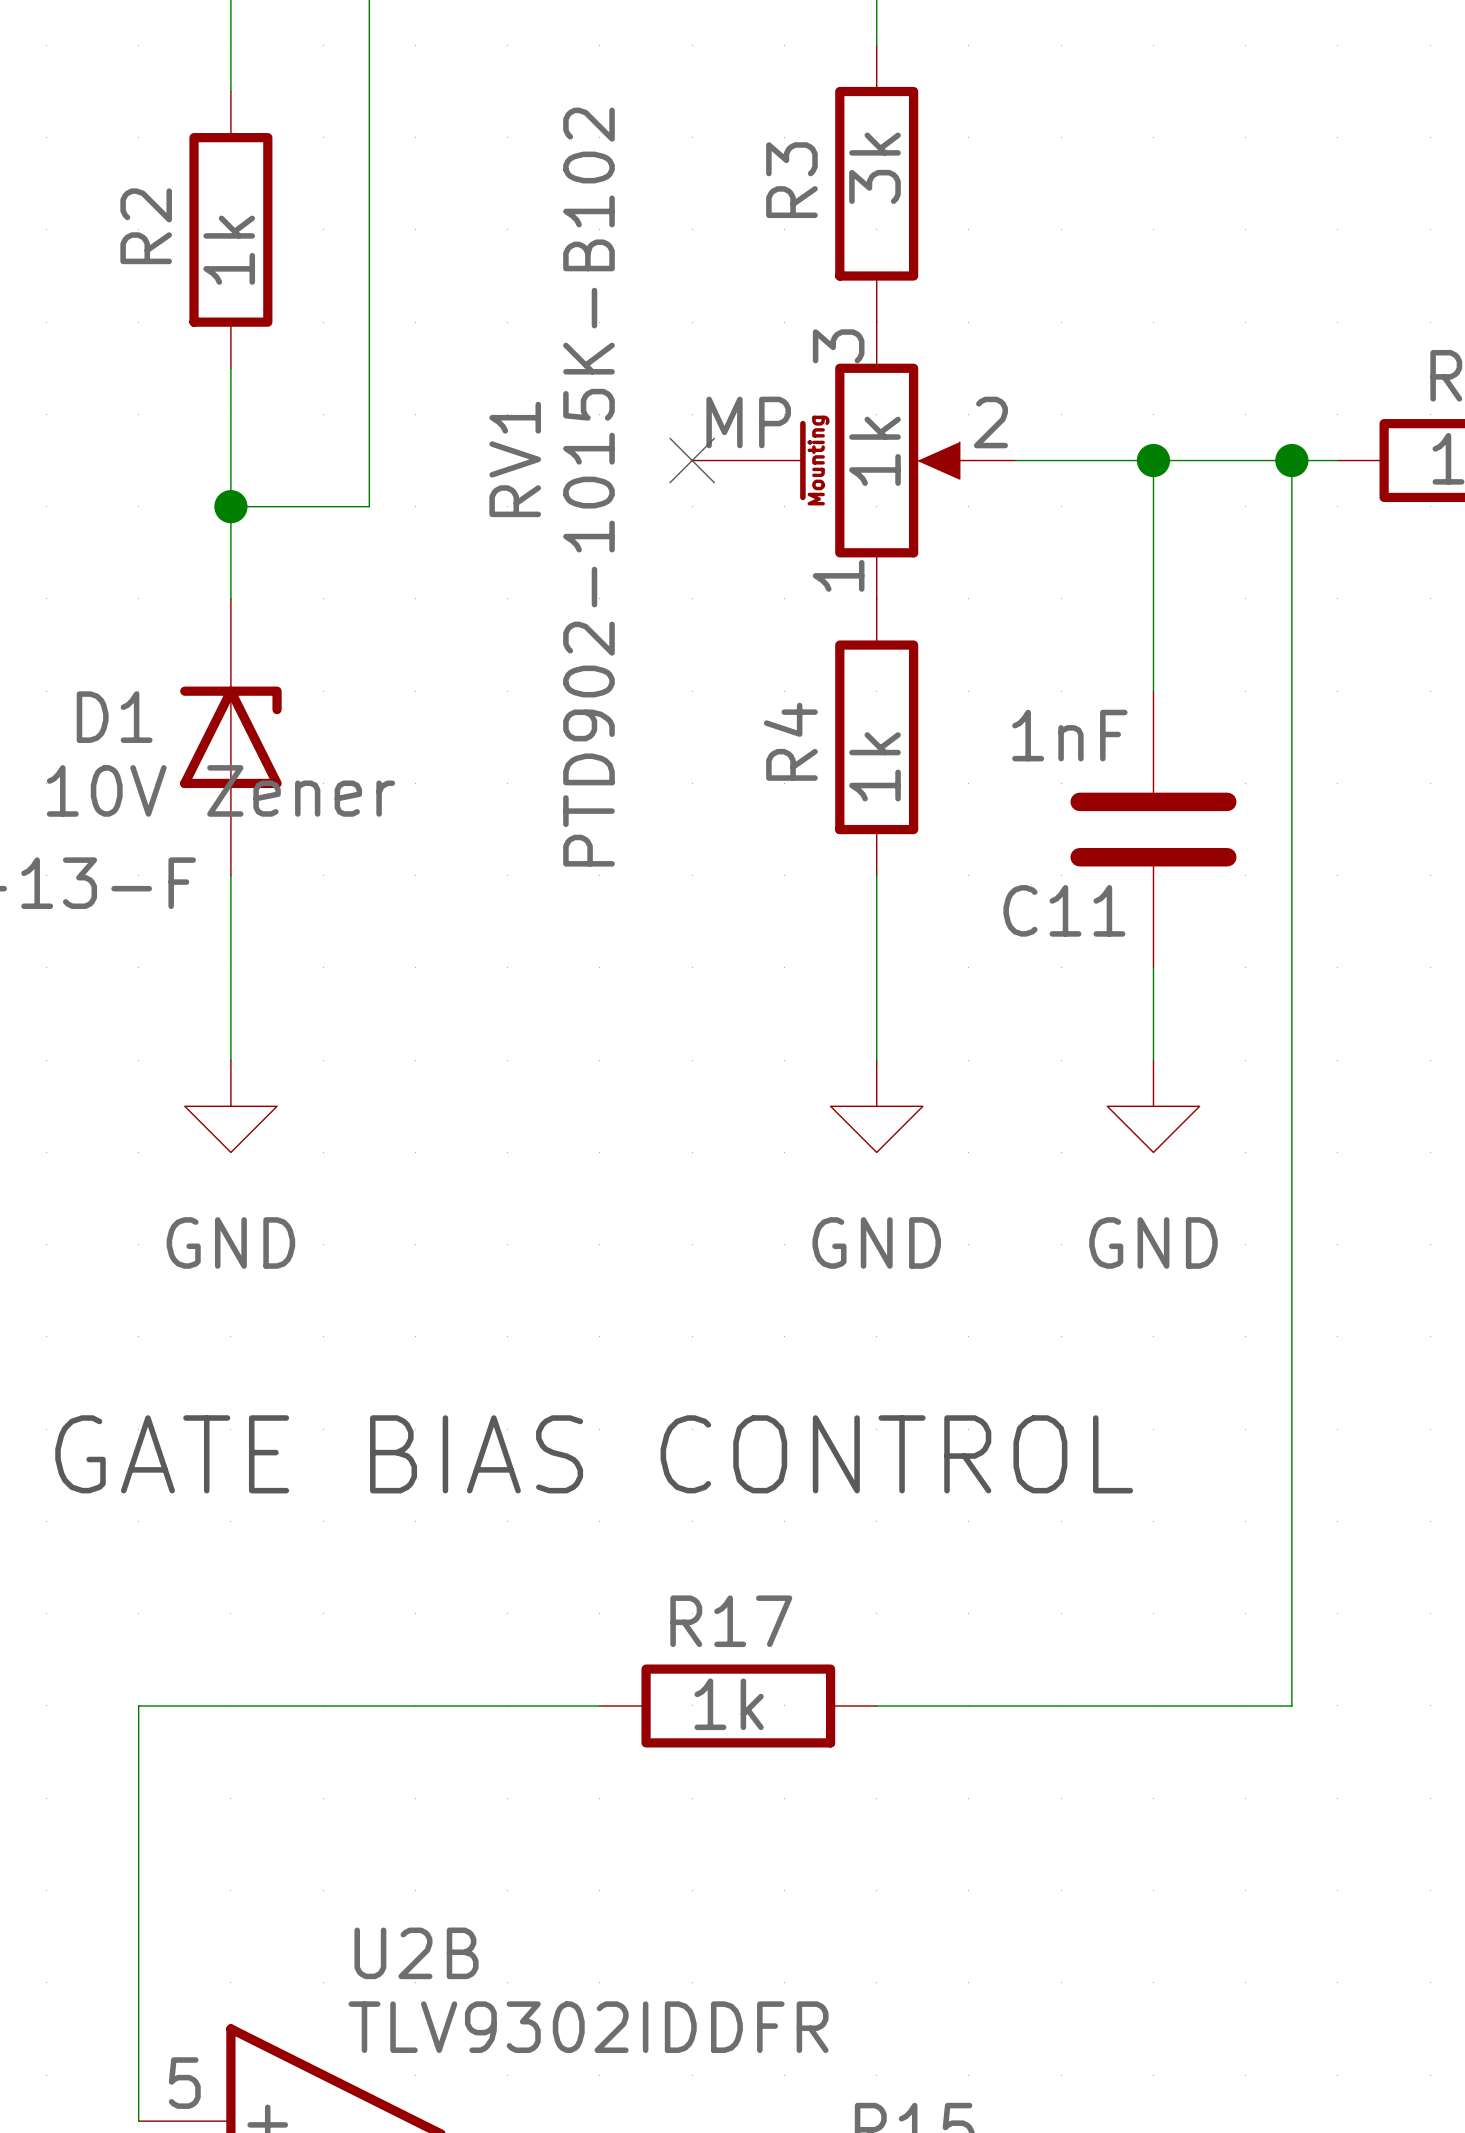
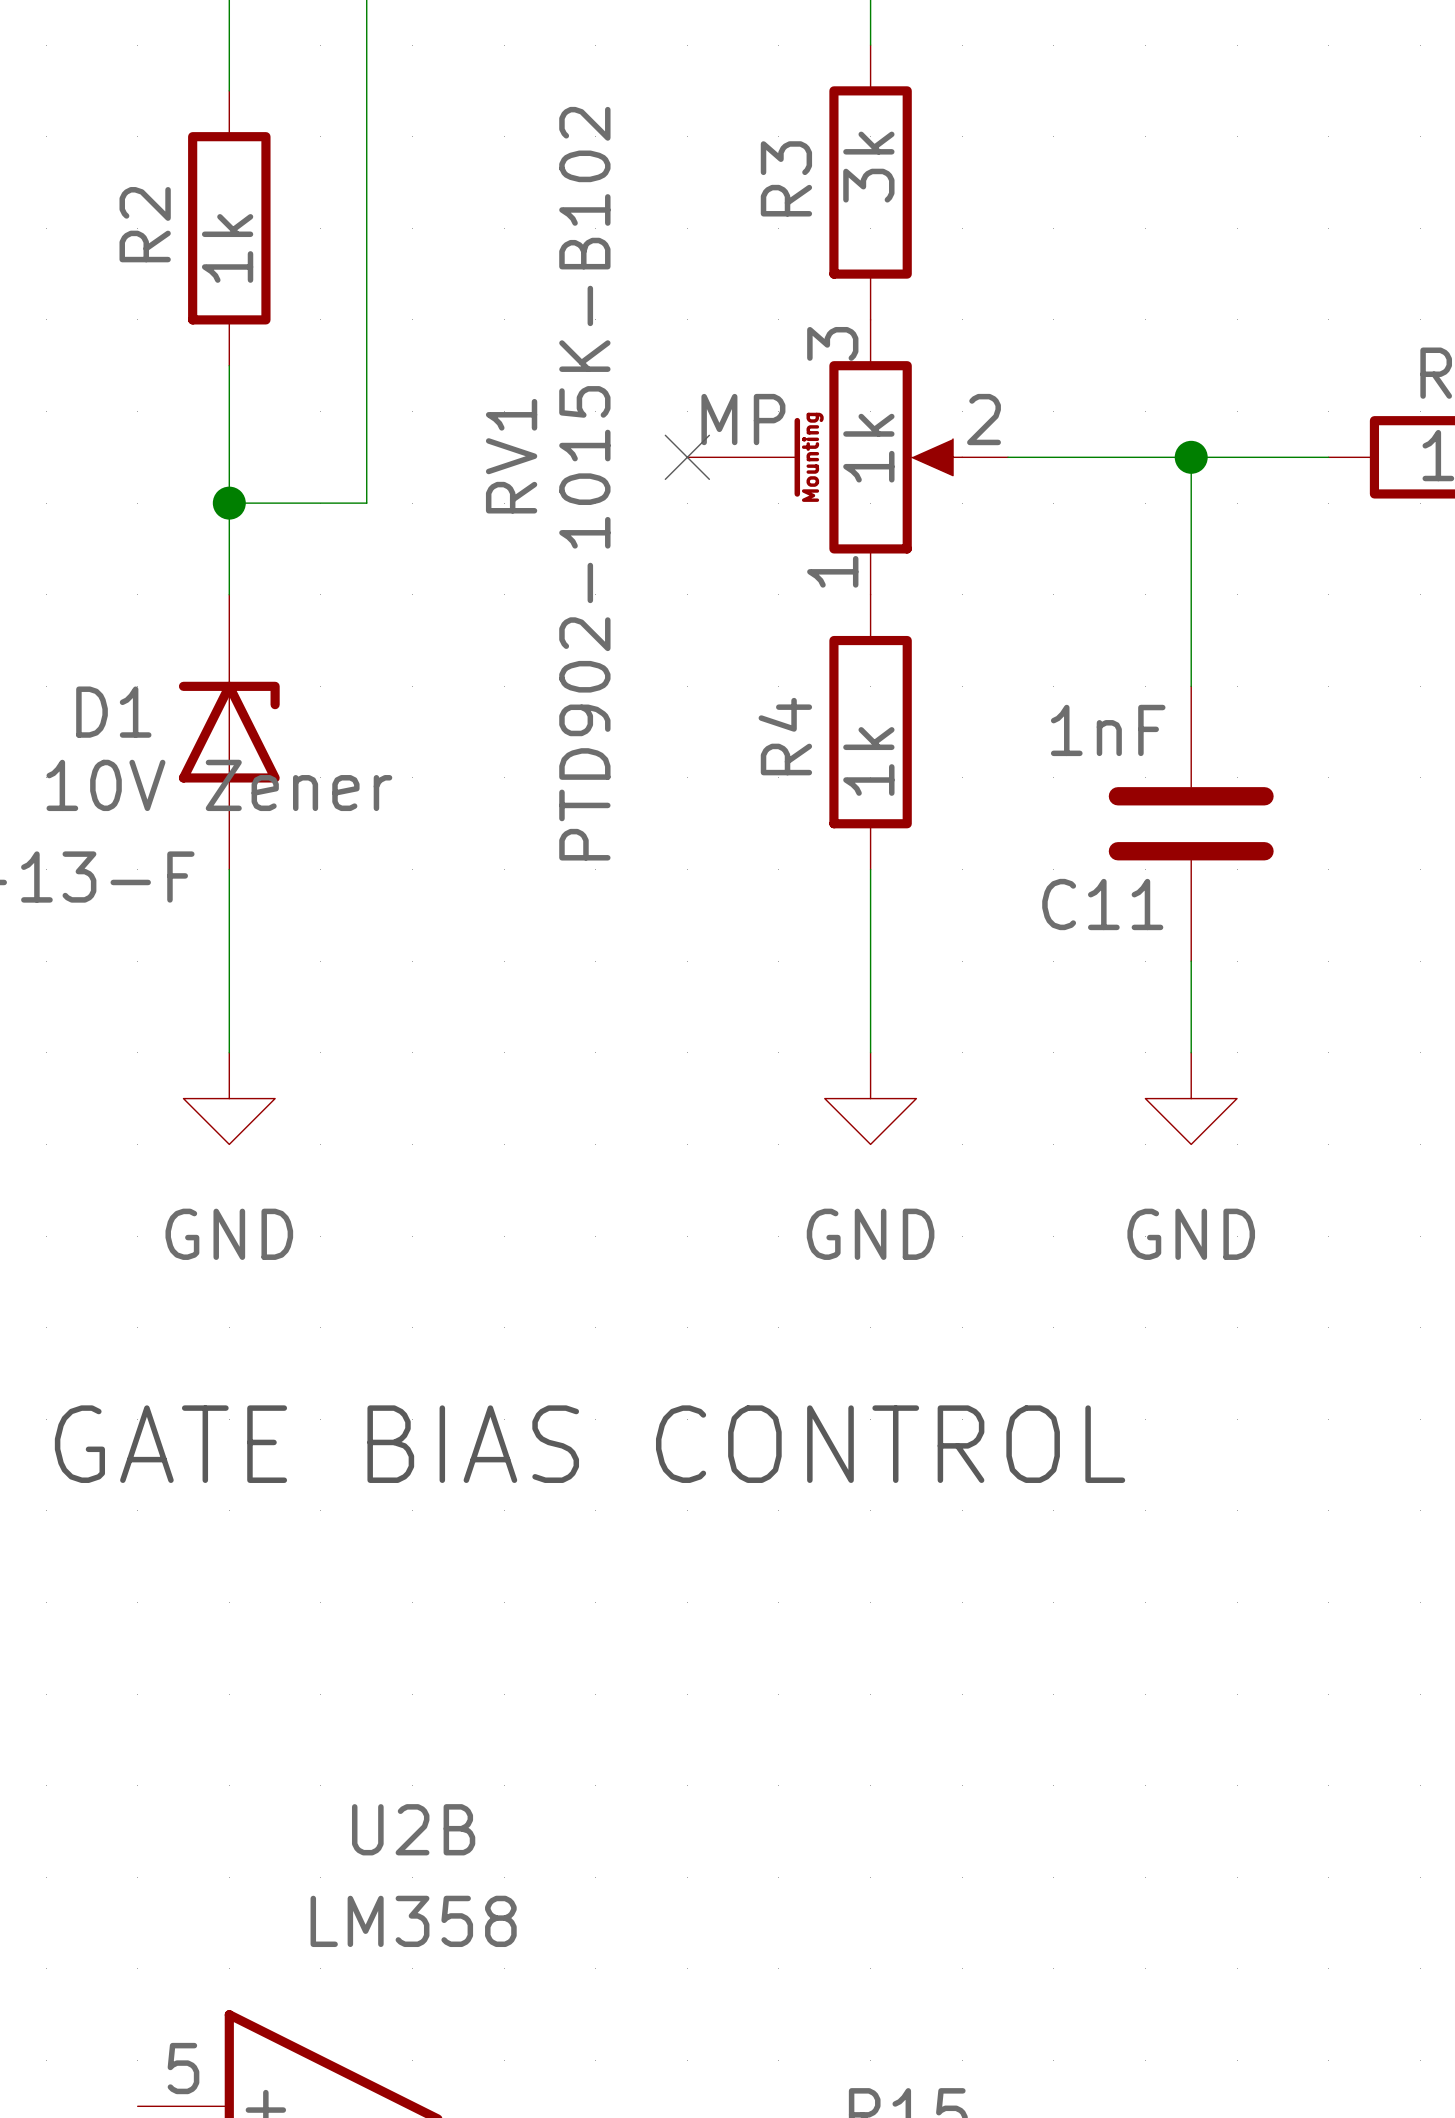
wire: (1153, 460) (1153, 691) -> (1191, 457) (1191, 686)
junction: (1153, 460) -> none
junction: none -> (1191, 457)
wire: (1291, 460) (1291, 1705) (876, 1705) -> none
junction: (1291, 460) -> none
C11 position: (1153, 829) -> (1191, 823)
wire: (1153, 967) (1153, 1060) -> (1191, 961) (1191, 1052)
power symbol position: GND (1153, 1106) -> GND (1191, 1098)
wire: (599, 1705) (138, 1705) (138, 2121) -> none
R17: 1k (738, 1705) -> none
U2B name position: U2B (416, 1953) -> U2B (413, 1829)
U2B value: TLV9302IDDFR (588, 2027) -> LM358 (413, 1921)

